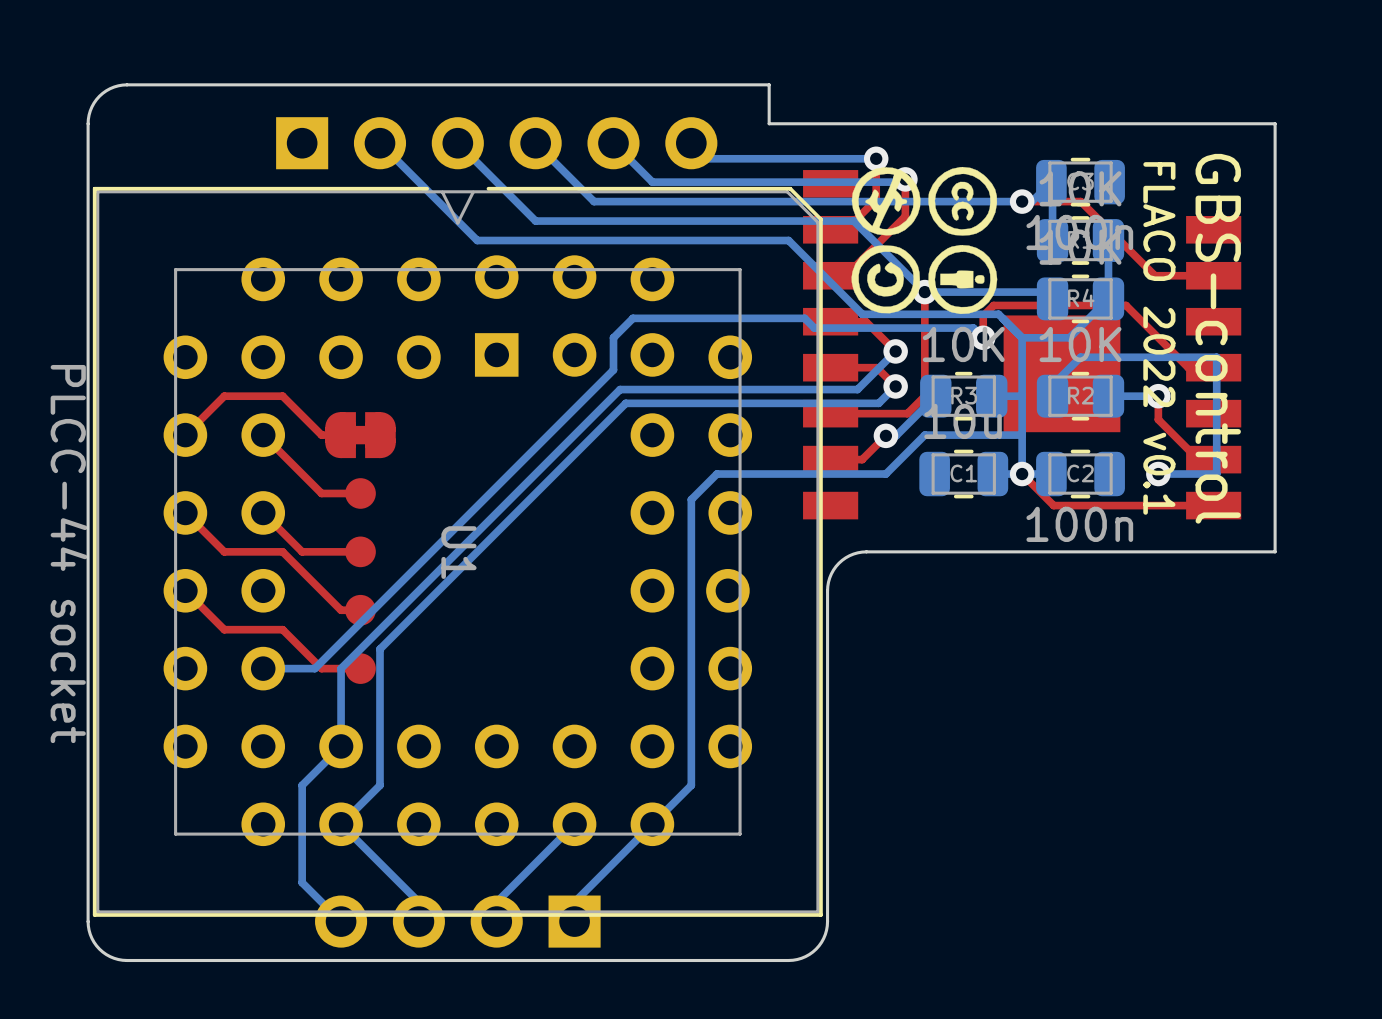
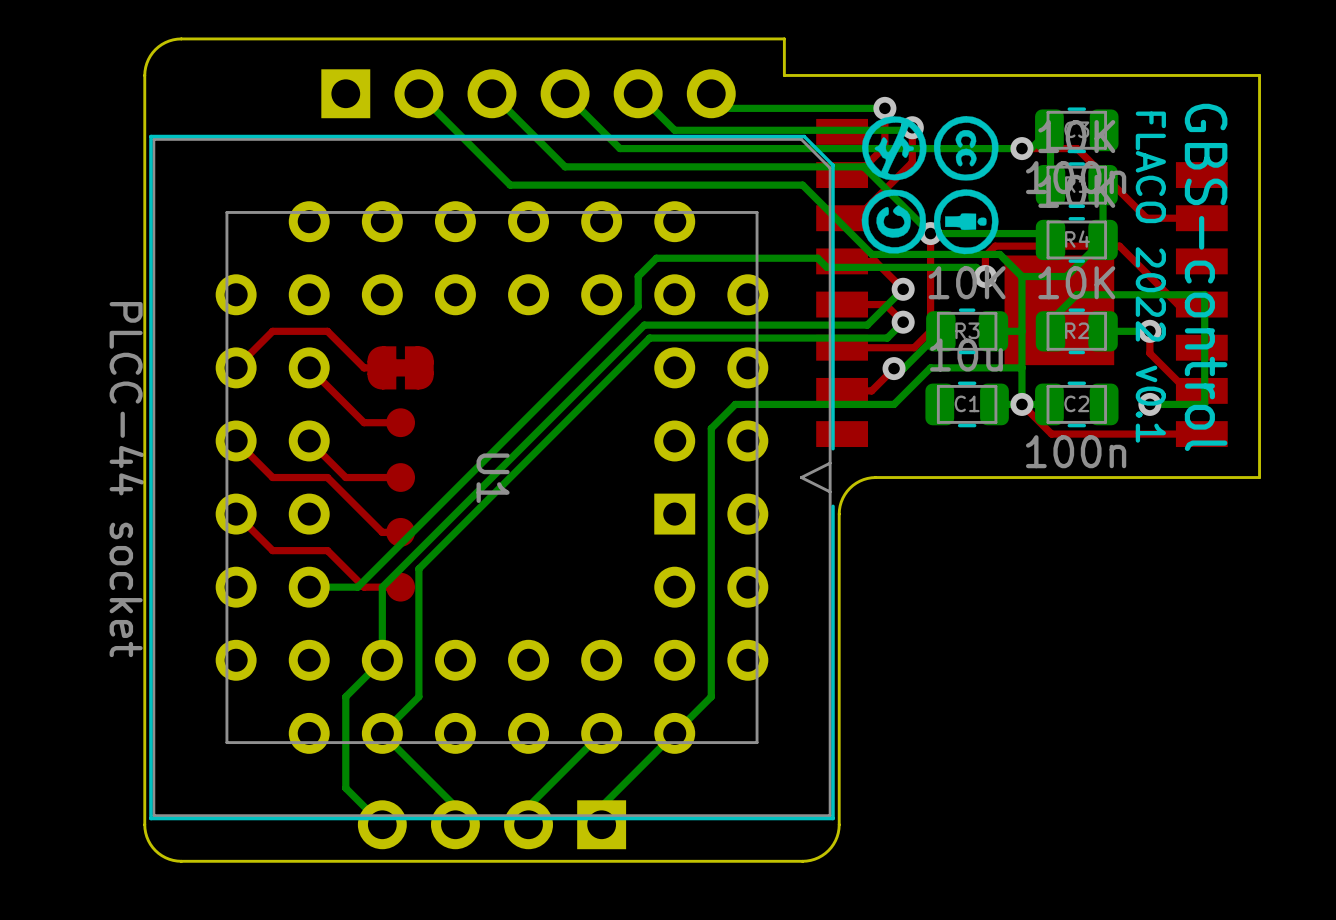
U1 footprint: [92, 186, 823, 917] -> [149, 134, 835, 821]

